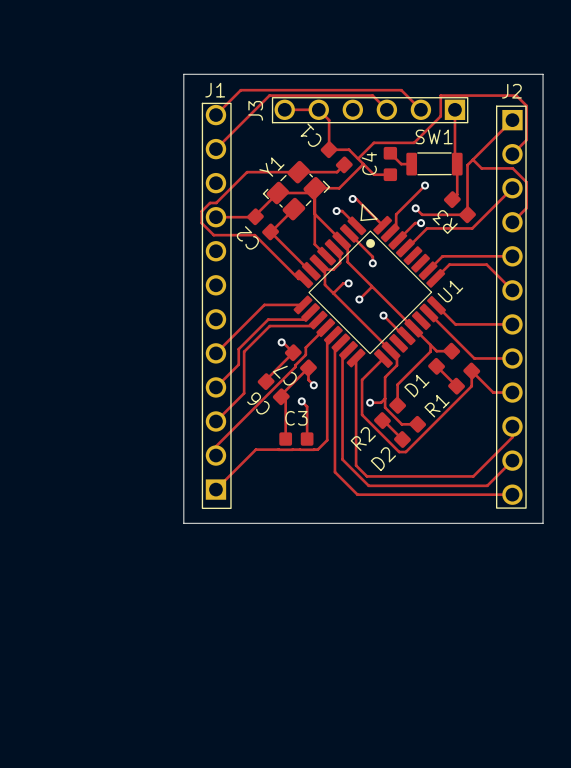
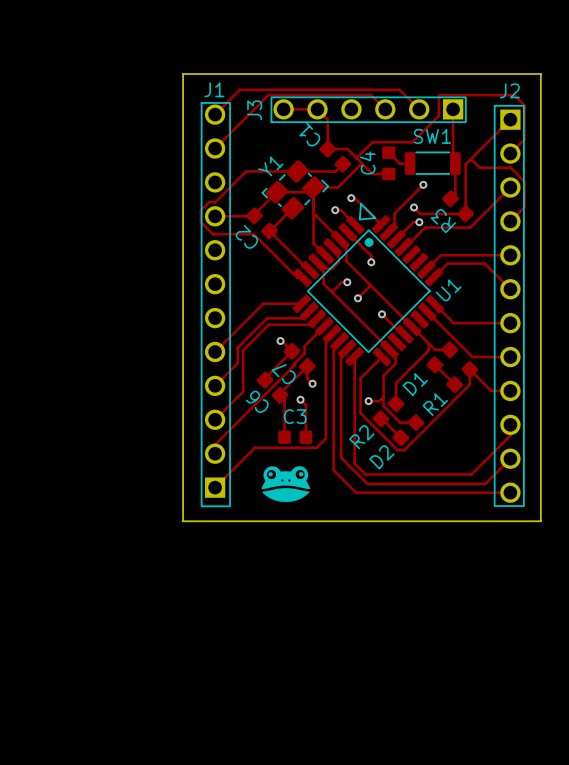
drawing: none -> [261, 466, 311, 502]

